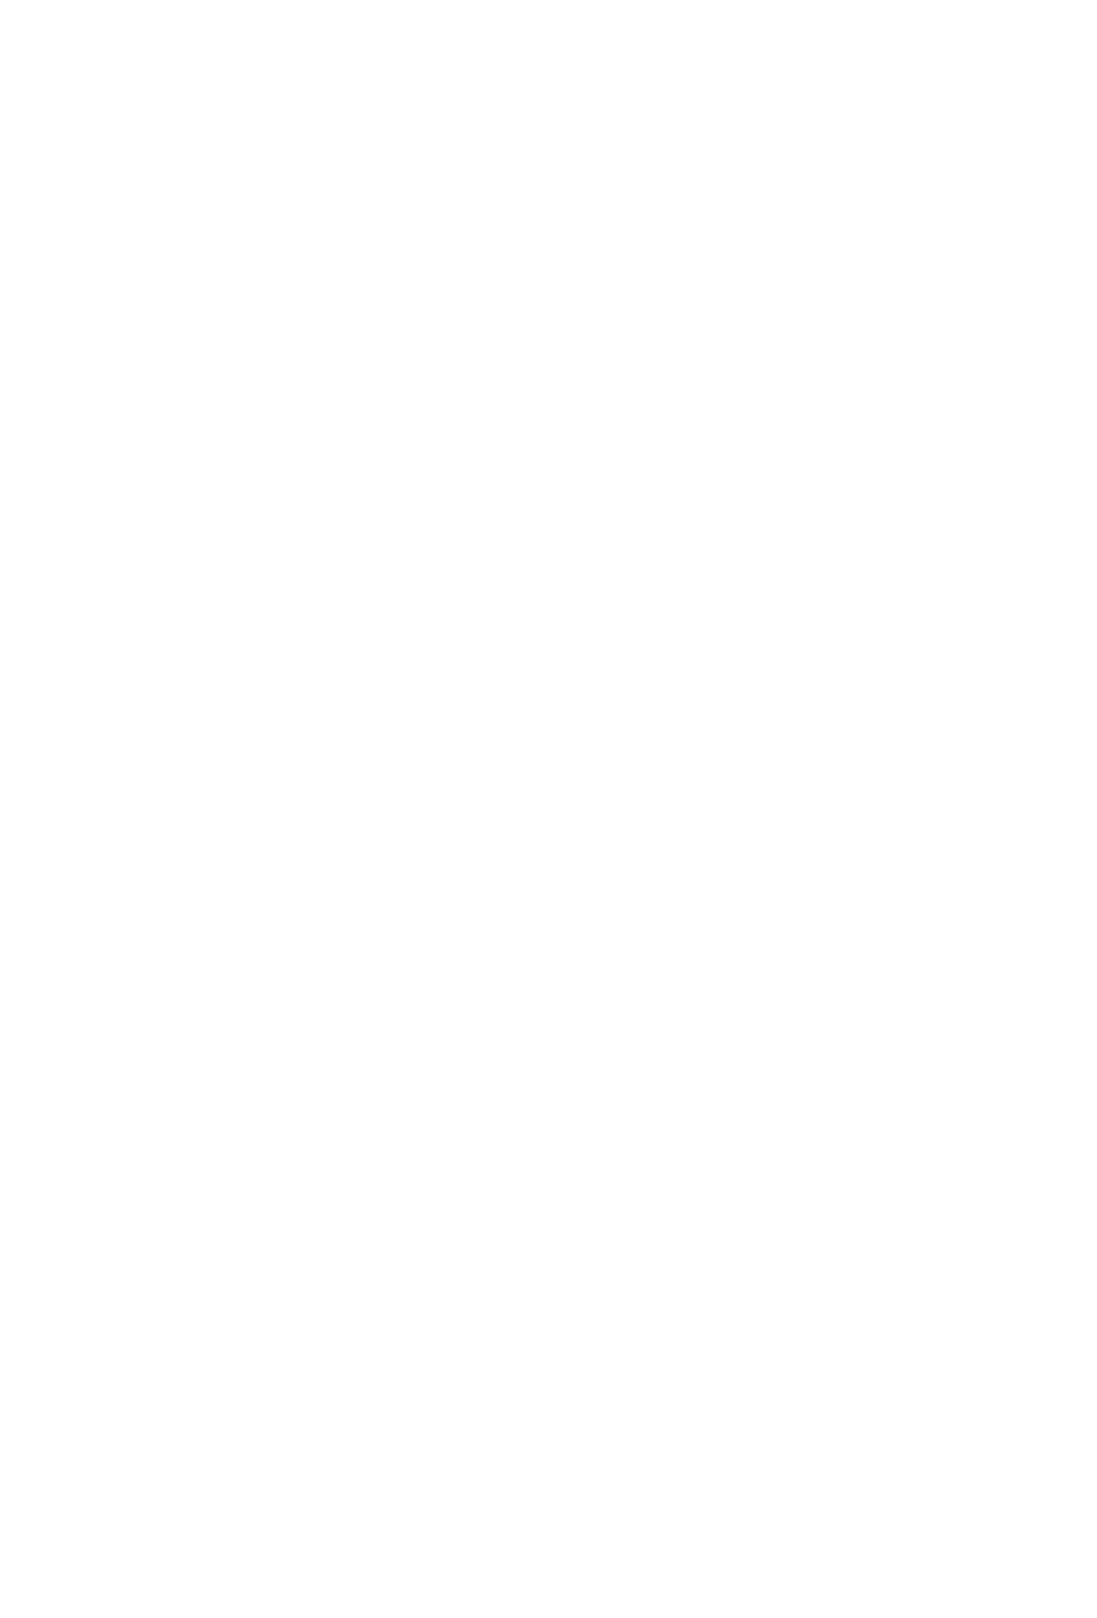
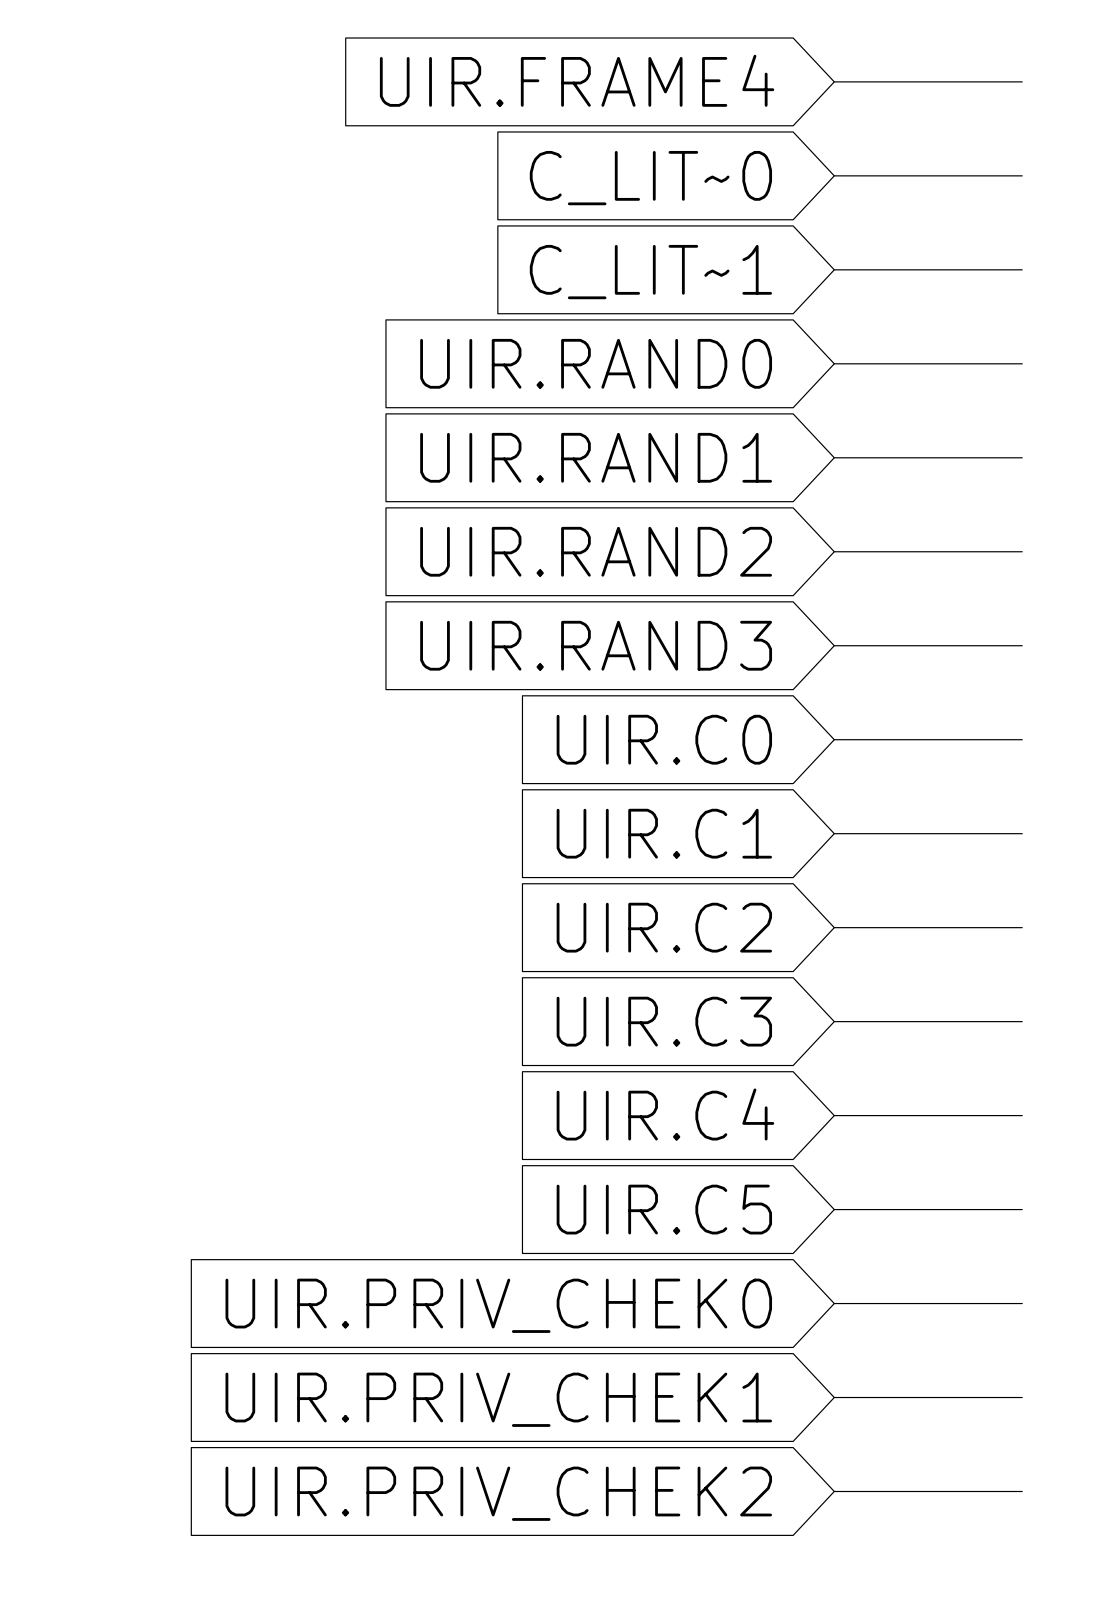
global label: none -> UIR.FRAME4 (577, 80)
wire: none -> (834, 81) (1022, 81)
wire: none -> (834, 175) (1022, 175)
global label: none -> C_LIT~0 (650, 178)
wire: none -> (834, 269) (1022, 269)
global label: none -> C_LIT~1 (650, 272)
global label: none -> UIR.RAND0 (596, 363)
wire: none -> (834, 363) (1022, 363)
global label: none -> UIR.RAND1 (596, 457)
wire: none -> (834, 457) (1022, 457)
global label: none -> UIR.RAND2 (596, 551)
wire: none -> (834, 551) (1022, 551)
global label: none -> UIR.RAND3 (596, 645)
wire: none -> (834, 645) (1022, 645)
global label: none -> UIR.C0 (664, 739)
wire: none -> (834, 739) (1022, 739)
global label: none -> UIR.C1 (664, 833)
wire: none -> (834, 833) (1022, 833)
global label: none -> UIR.C2 (664, 927)
wire: none -> (834, 927) (1022, 927)
global label: none -> UIR.C3 (664, 1021)
wire: none -> (834, 1021) (1022, 1021)
global label: none -> UIR.C4 (665, 1114)
wire: none -> (834, 1115) (1022, 1115)
global label: none -> UIR.C5 (664, 1209)
wire: none -> (834, 1209) (1022, 1209)
wire: none -> (834, 1303) (1022, 1303)
global label: none -> UIR.PRIV_CHEK0 (498, 1305)
wire: none -> (834, 1397) (1022, 1397)
global label: none -> UIR.PRIV_CHEK1 (498, 1399)
wire: none -> (834, 1491) (1022, 1491)
global label: none -> UIR.PRIV_CHEK2 (498, 1493)

